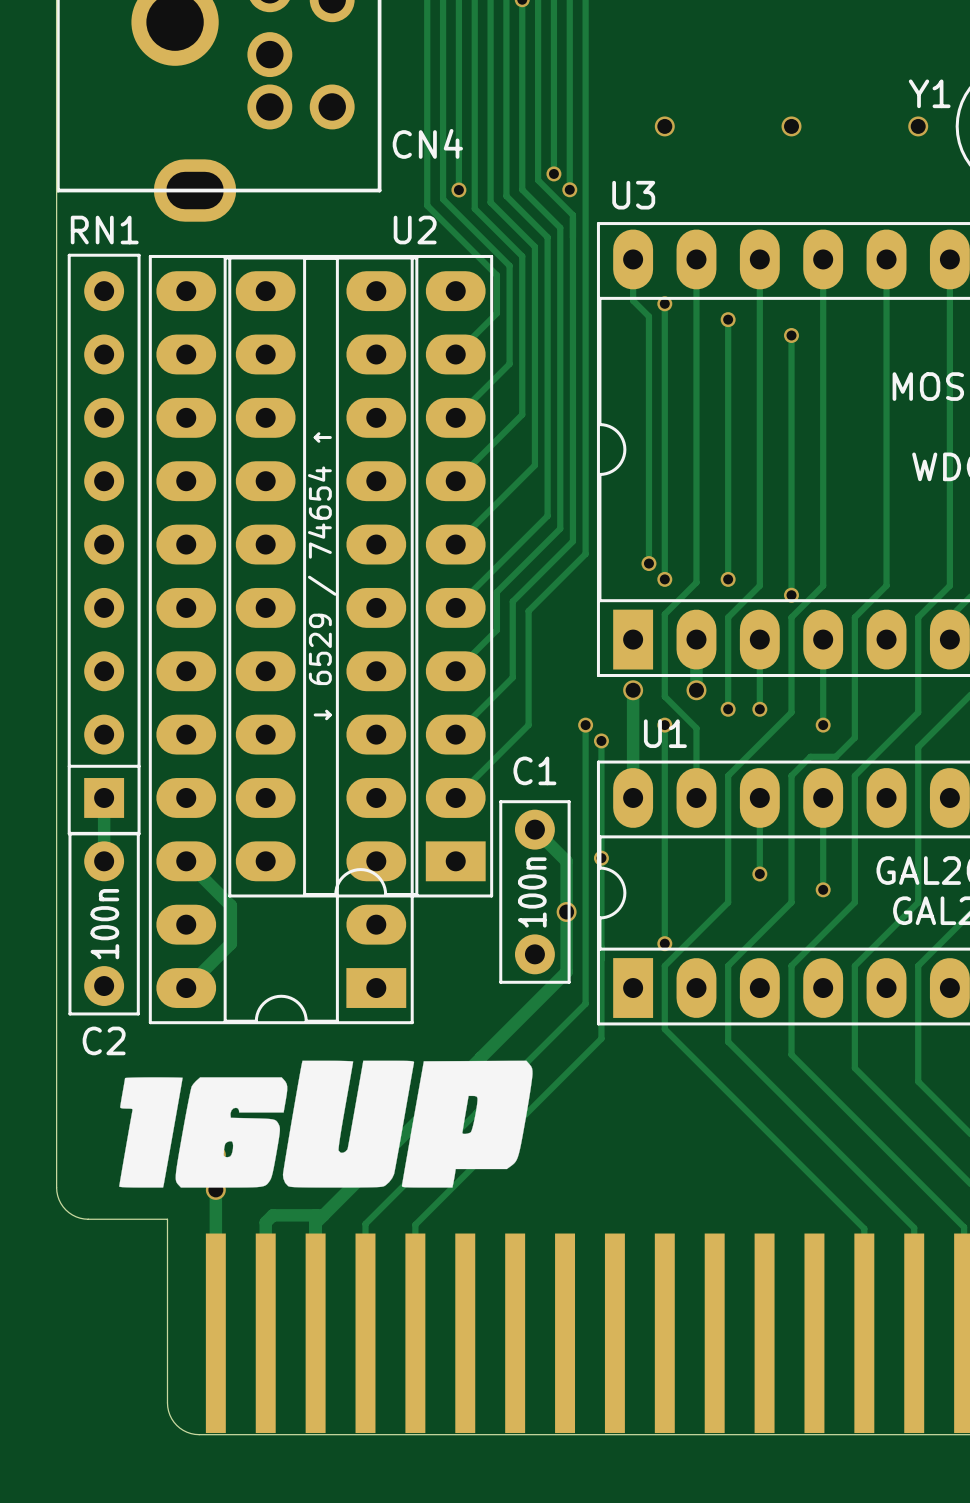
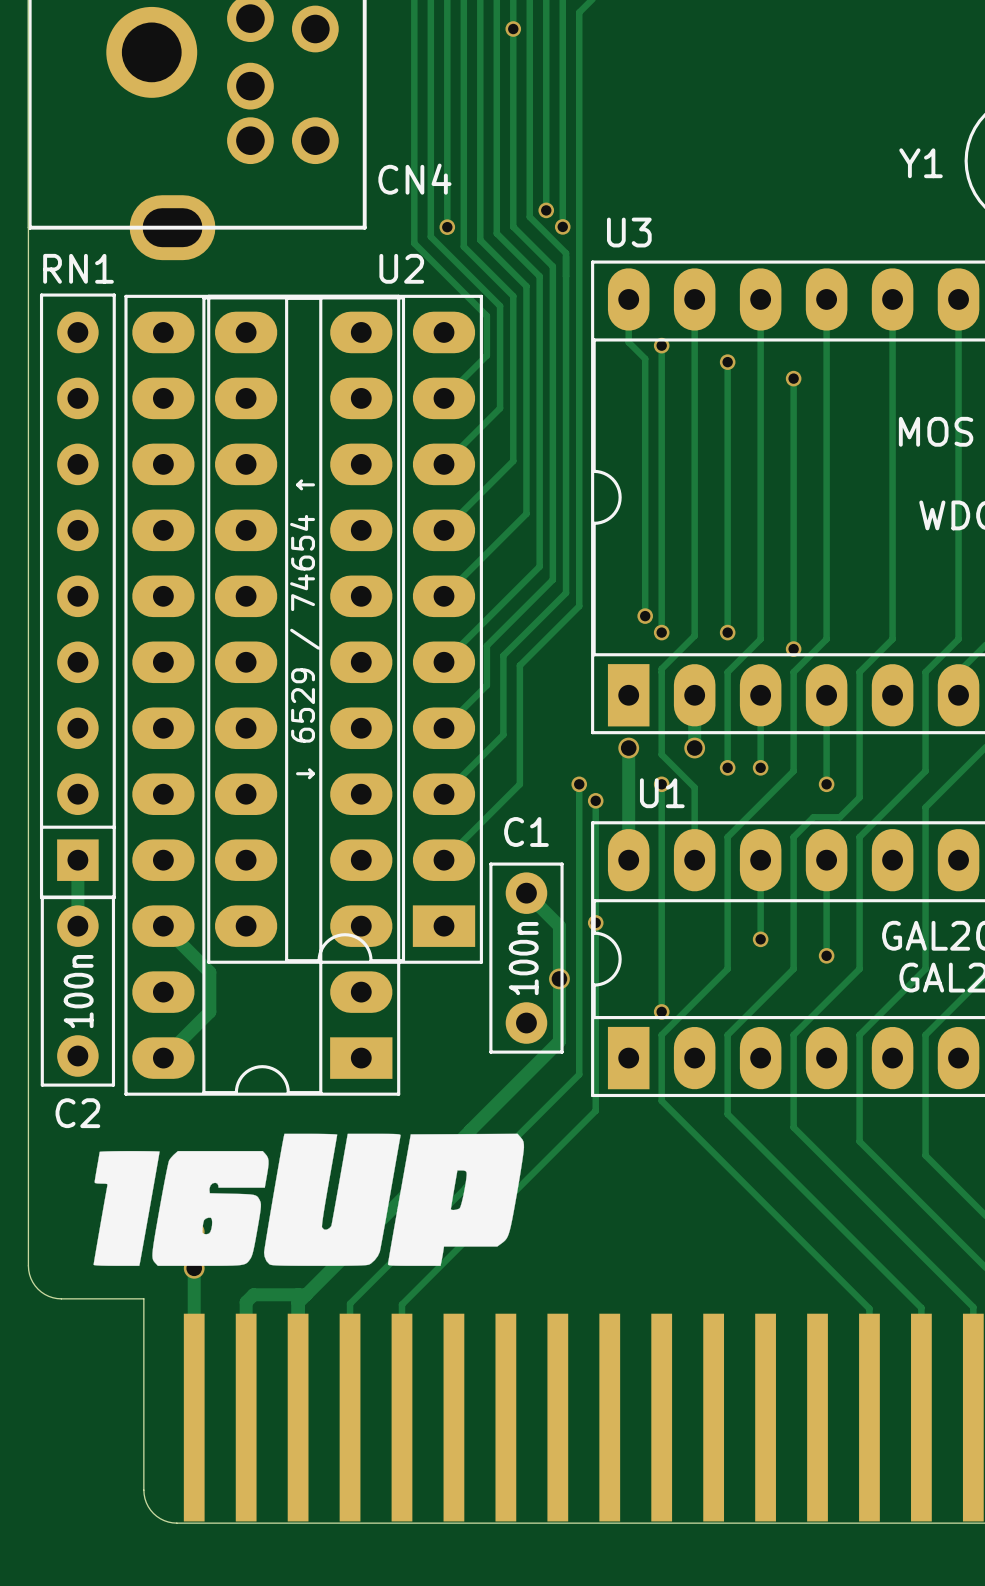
Y1 name position: Y1 (929, 93) -> Y1 (921, 163)
via: (664, 126) -> none
via: (791, 126) -> none
via: (918, 126) -> none

